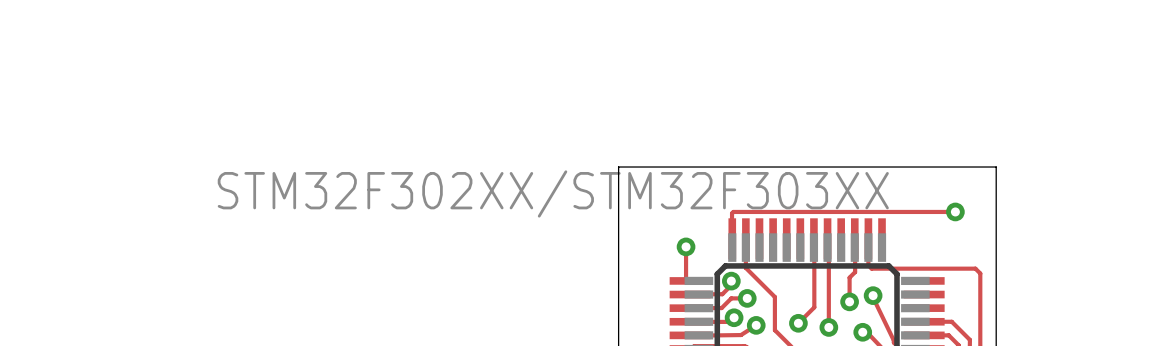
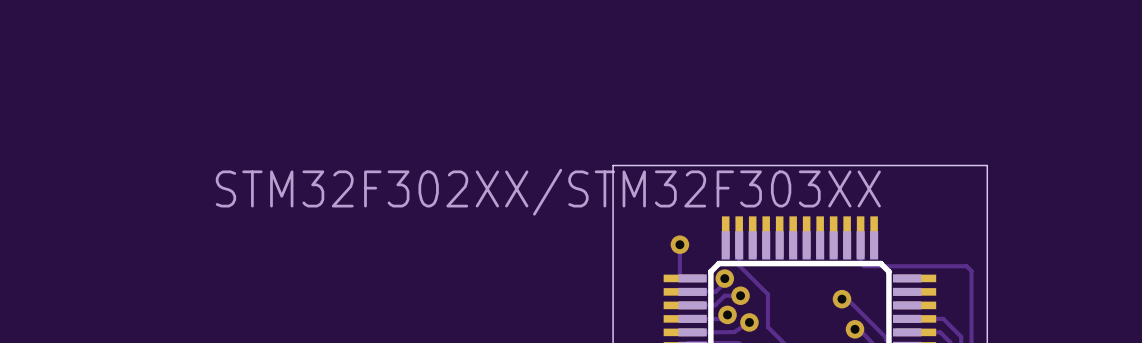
track: (955, 211) (733, 211) (732, 238) -> none
via: (955, 211) -> none
track: (827, 238) (828, 327) -> none
track: (814, 239) (814, 307) (798, 323) -> none
track: (855, 239) (855, 272) (849, 277) (849, 301) -> none
track: (873, 295) (893, 340) -> (844, 300) (848, 300) (885, 337)
via: (873, 295) -> none
via: (798, 323) -> none
via: (828, 327) -> none

